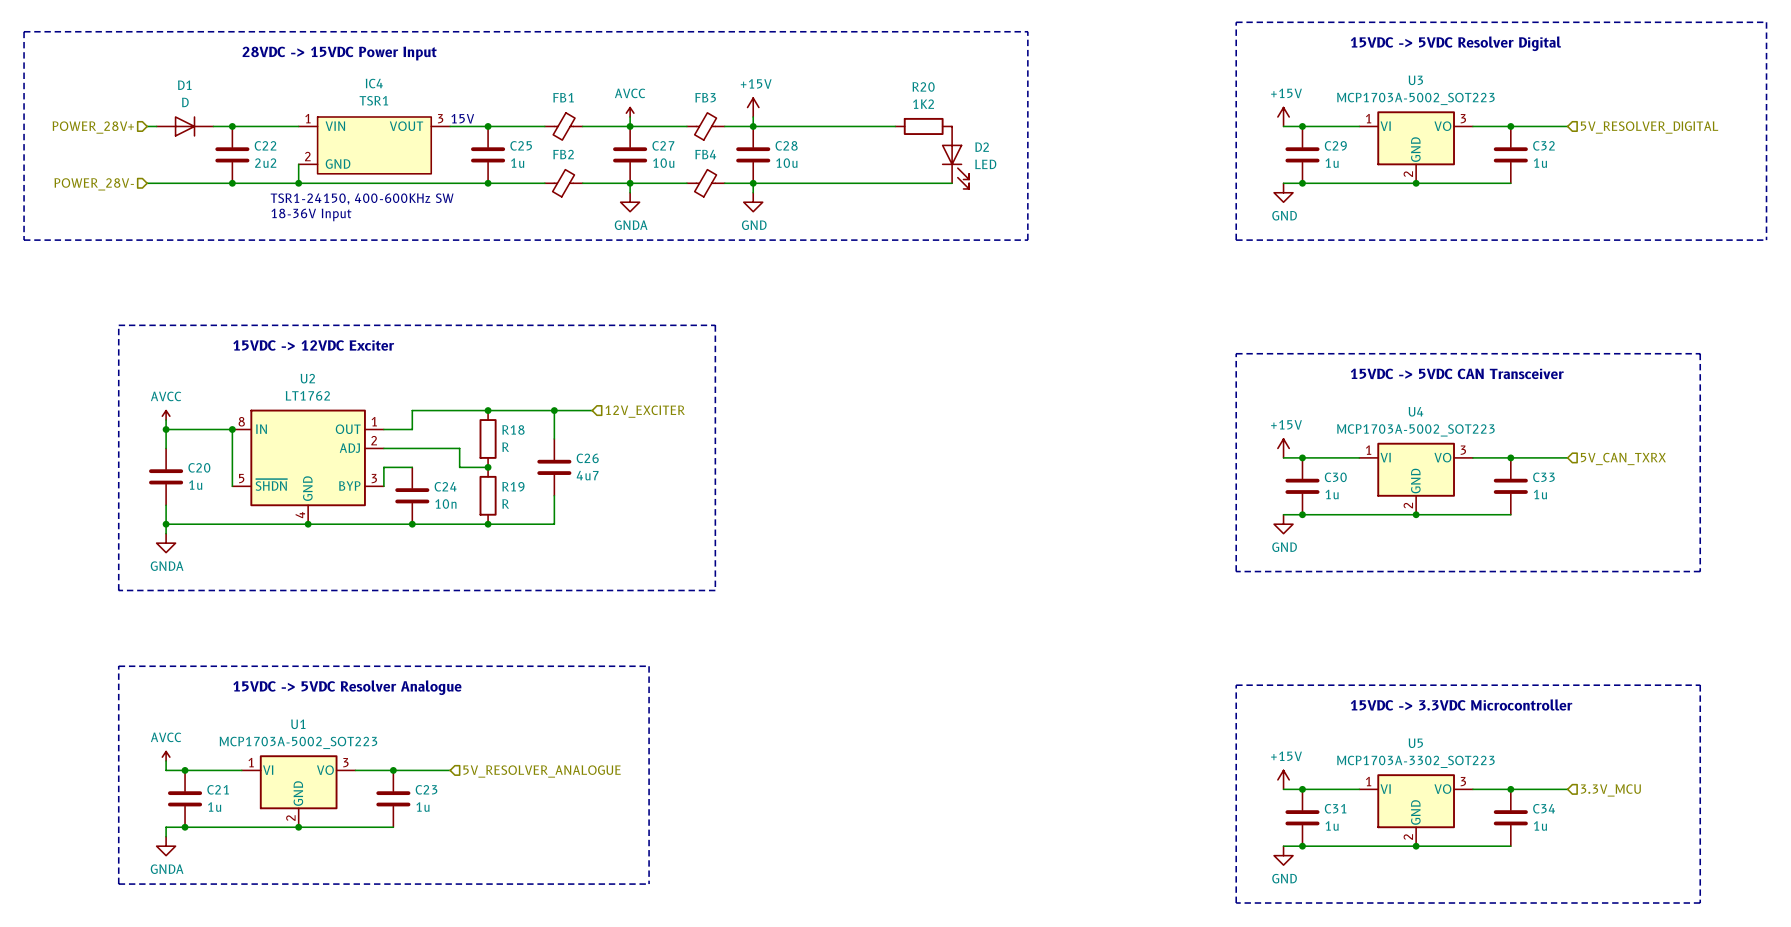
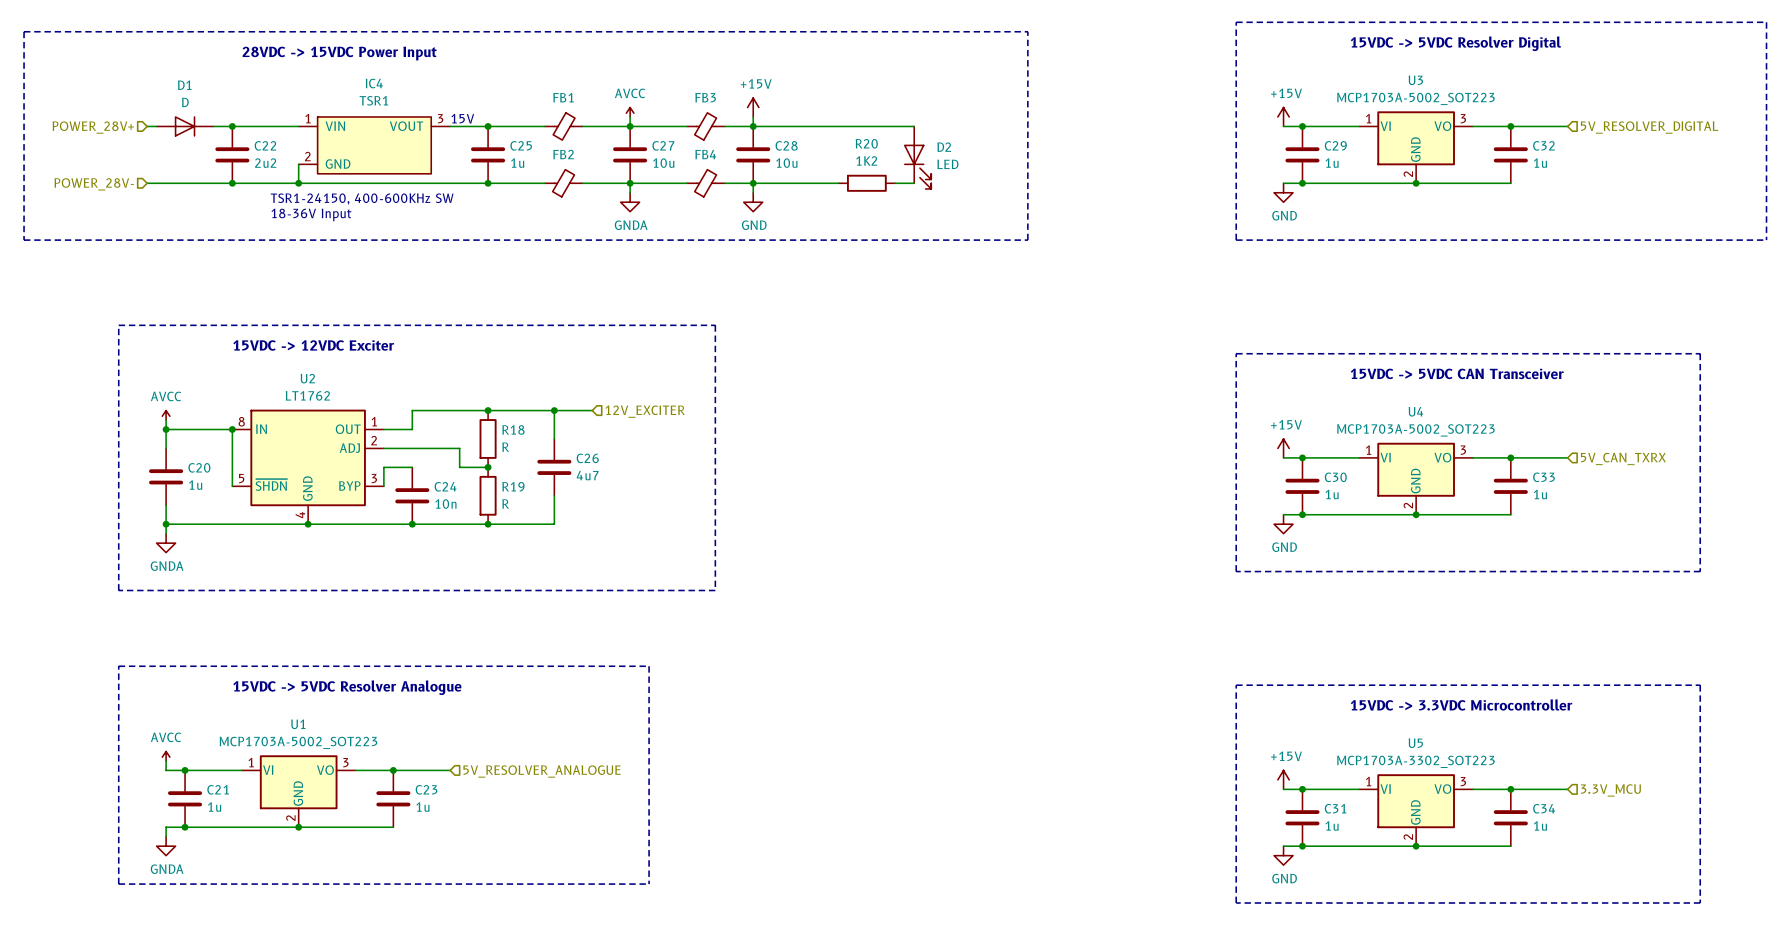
R20 position: (923, 126) -> (866, 183)
D2 position: (955, 157) -> (917, 157)
wire: (838, 183) (895, 183) -> none
wire: (914, 183) (952, 183) -> none

